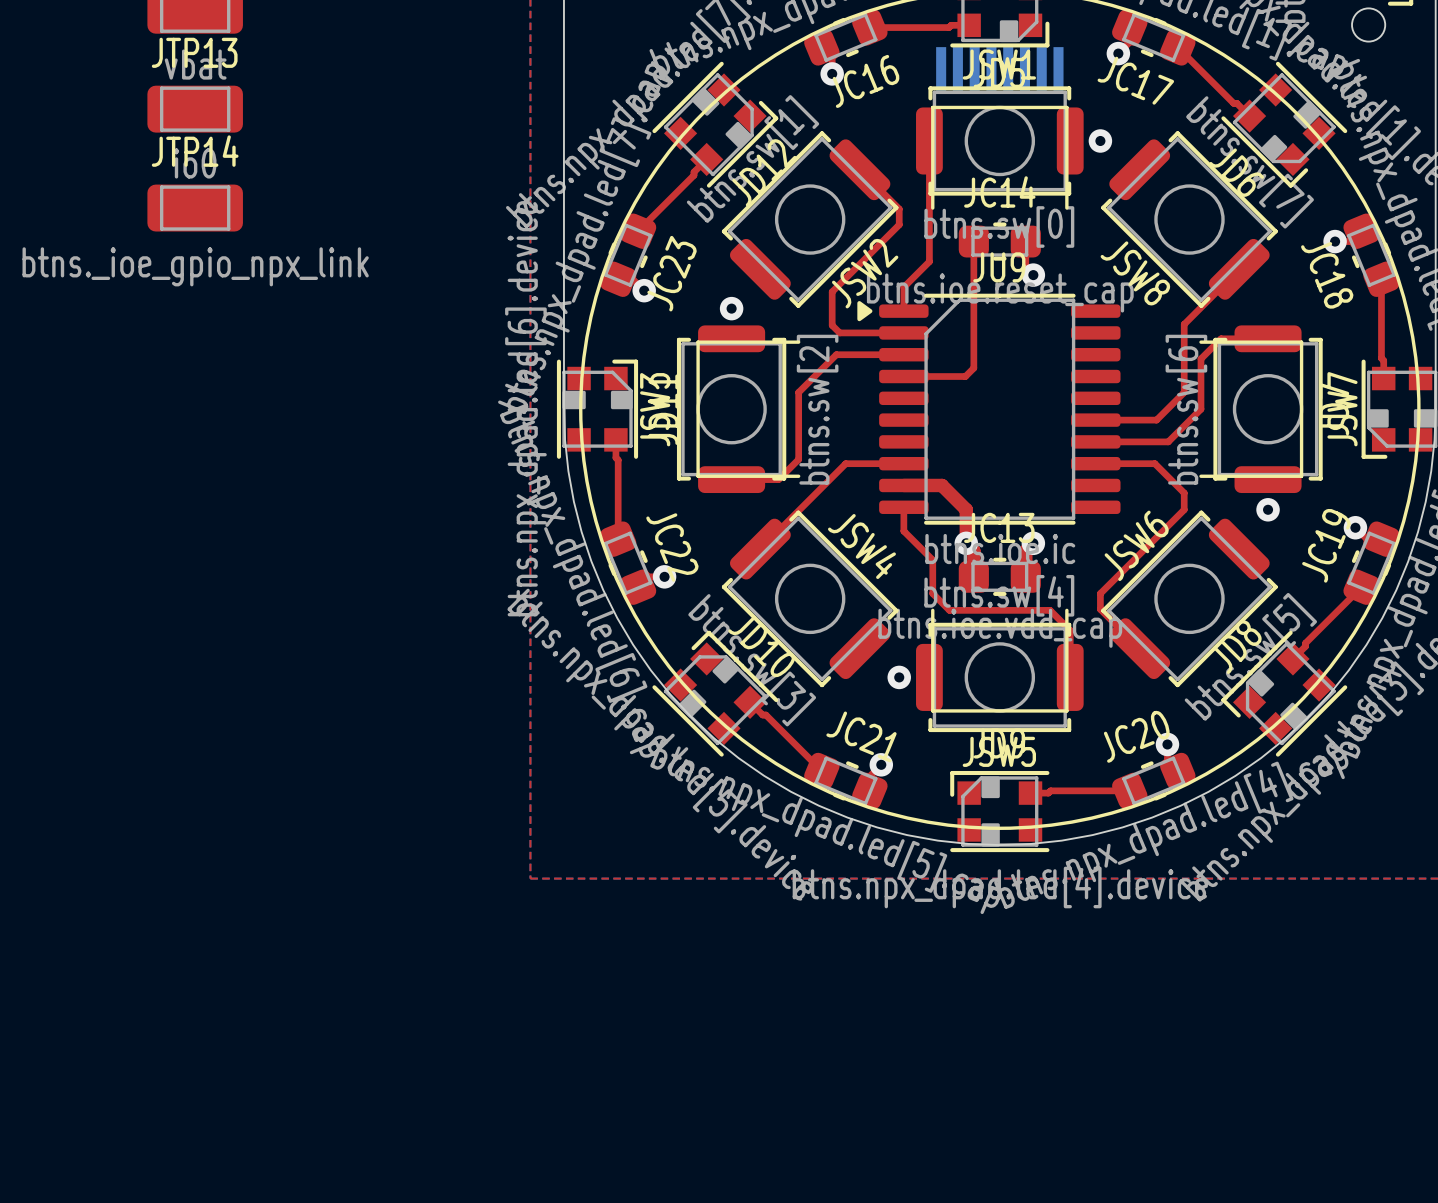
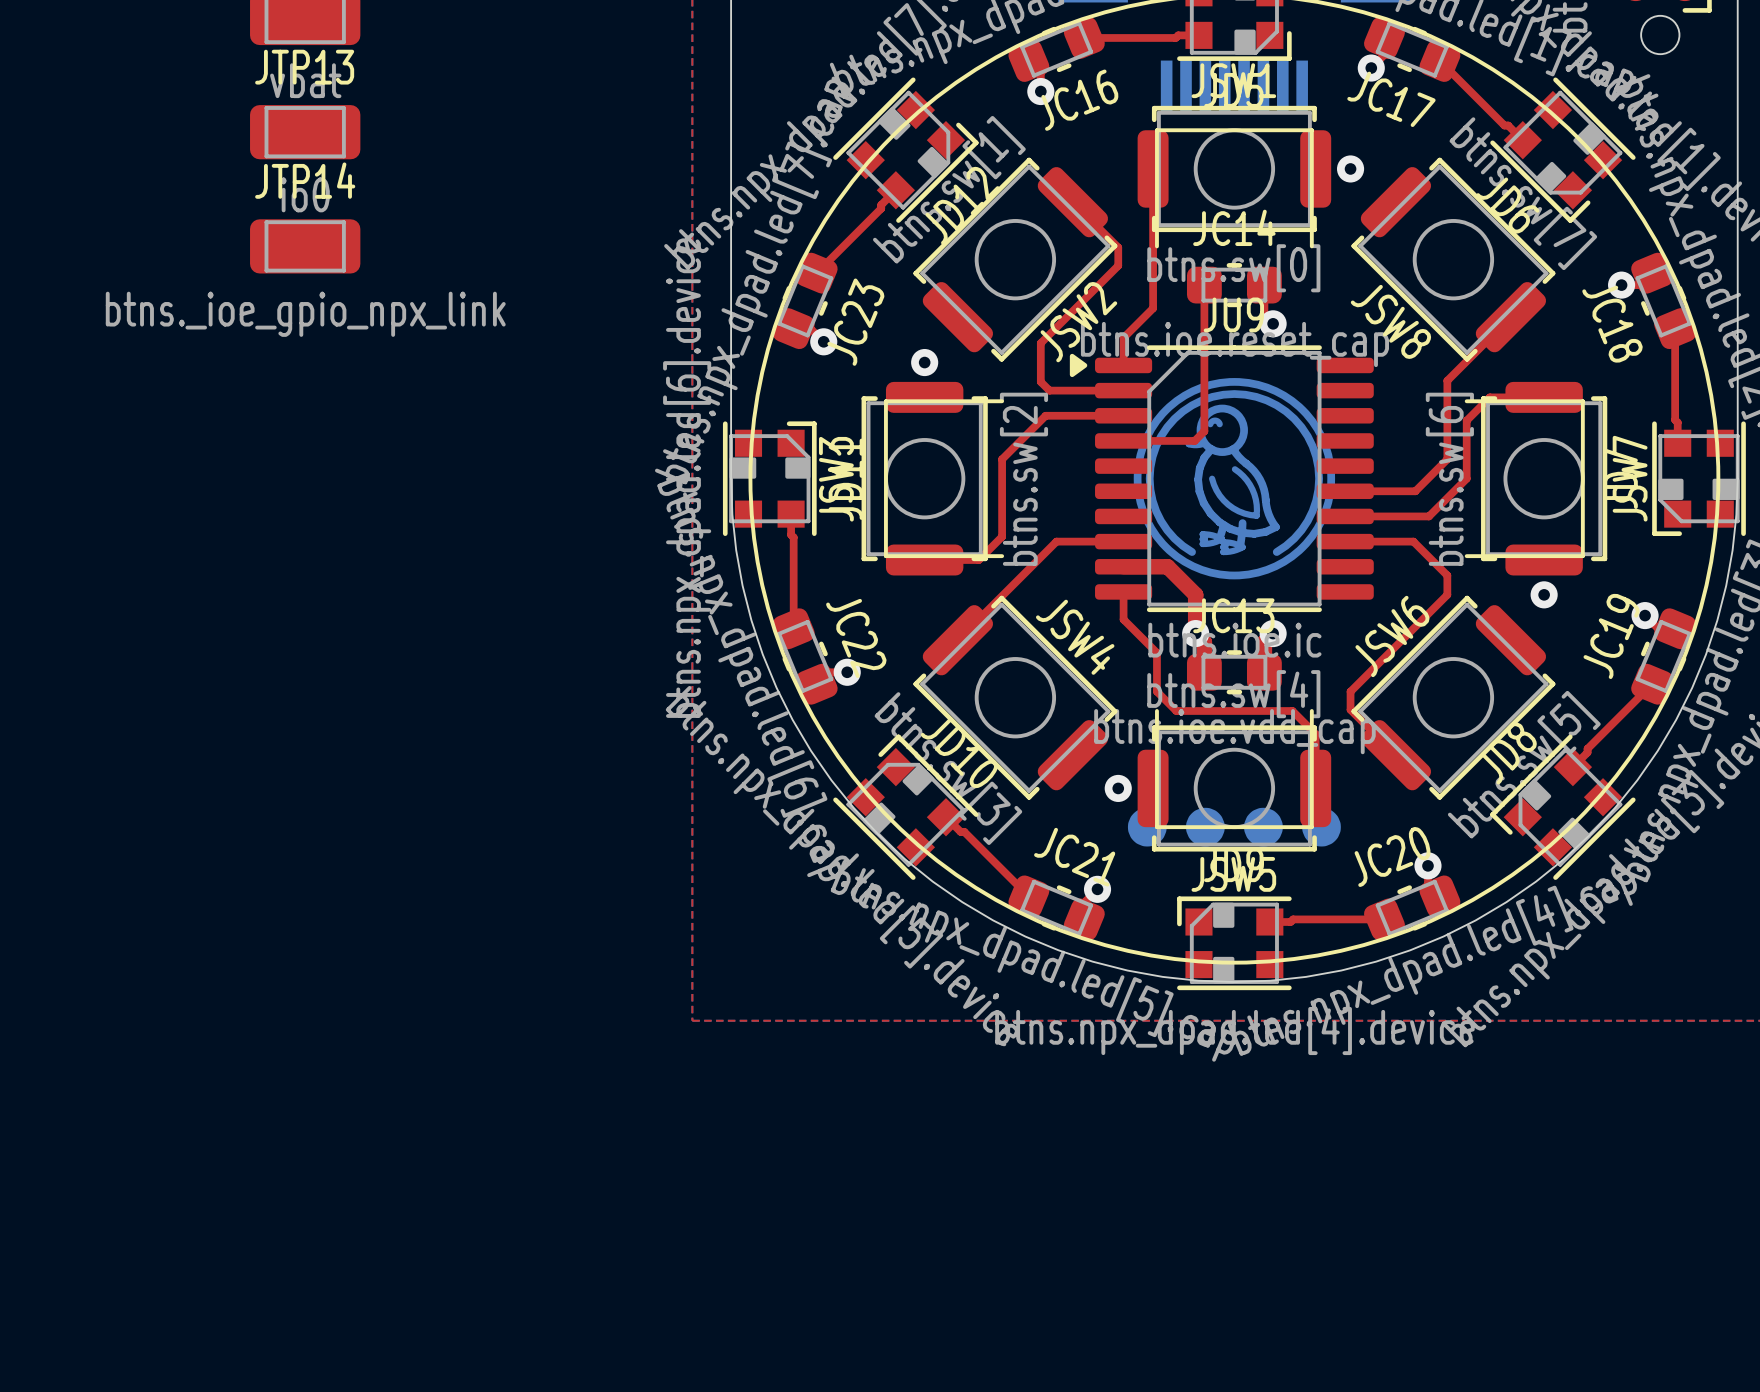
drawing: none -> [1133, 378, 1336, 580]
drawing: none -> [1127, 807, 1341, 847]

